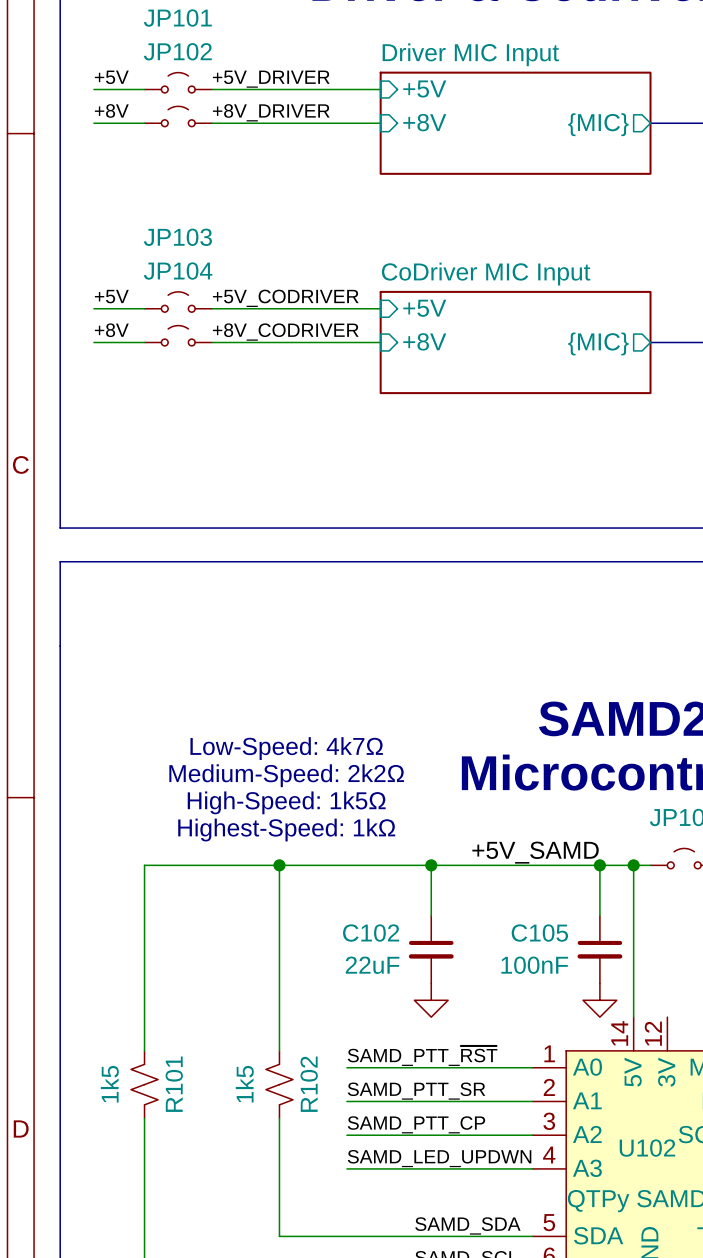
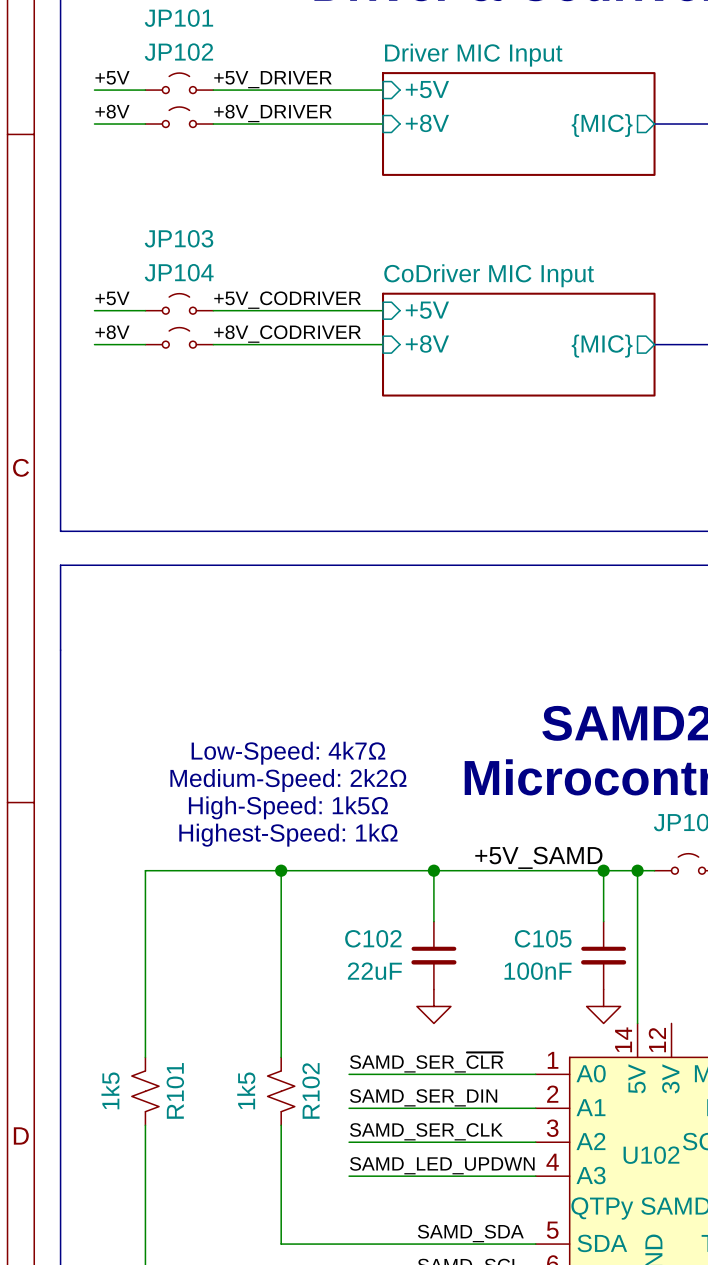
label: SAMD_PTT_~{RST} (422, 1055) -> SAMD_SER_~{CLR} (426, 1062)
label: SAMD_PTT_SR (416, 1091) -> SAMD_SER_DIN (423, 1097)
label: SAMD_PTT_CP (416, 1124) -> SAMD_SER_CLK (426, 1131)

